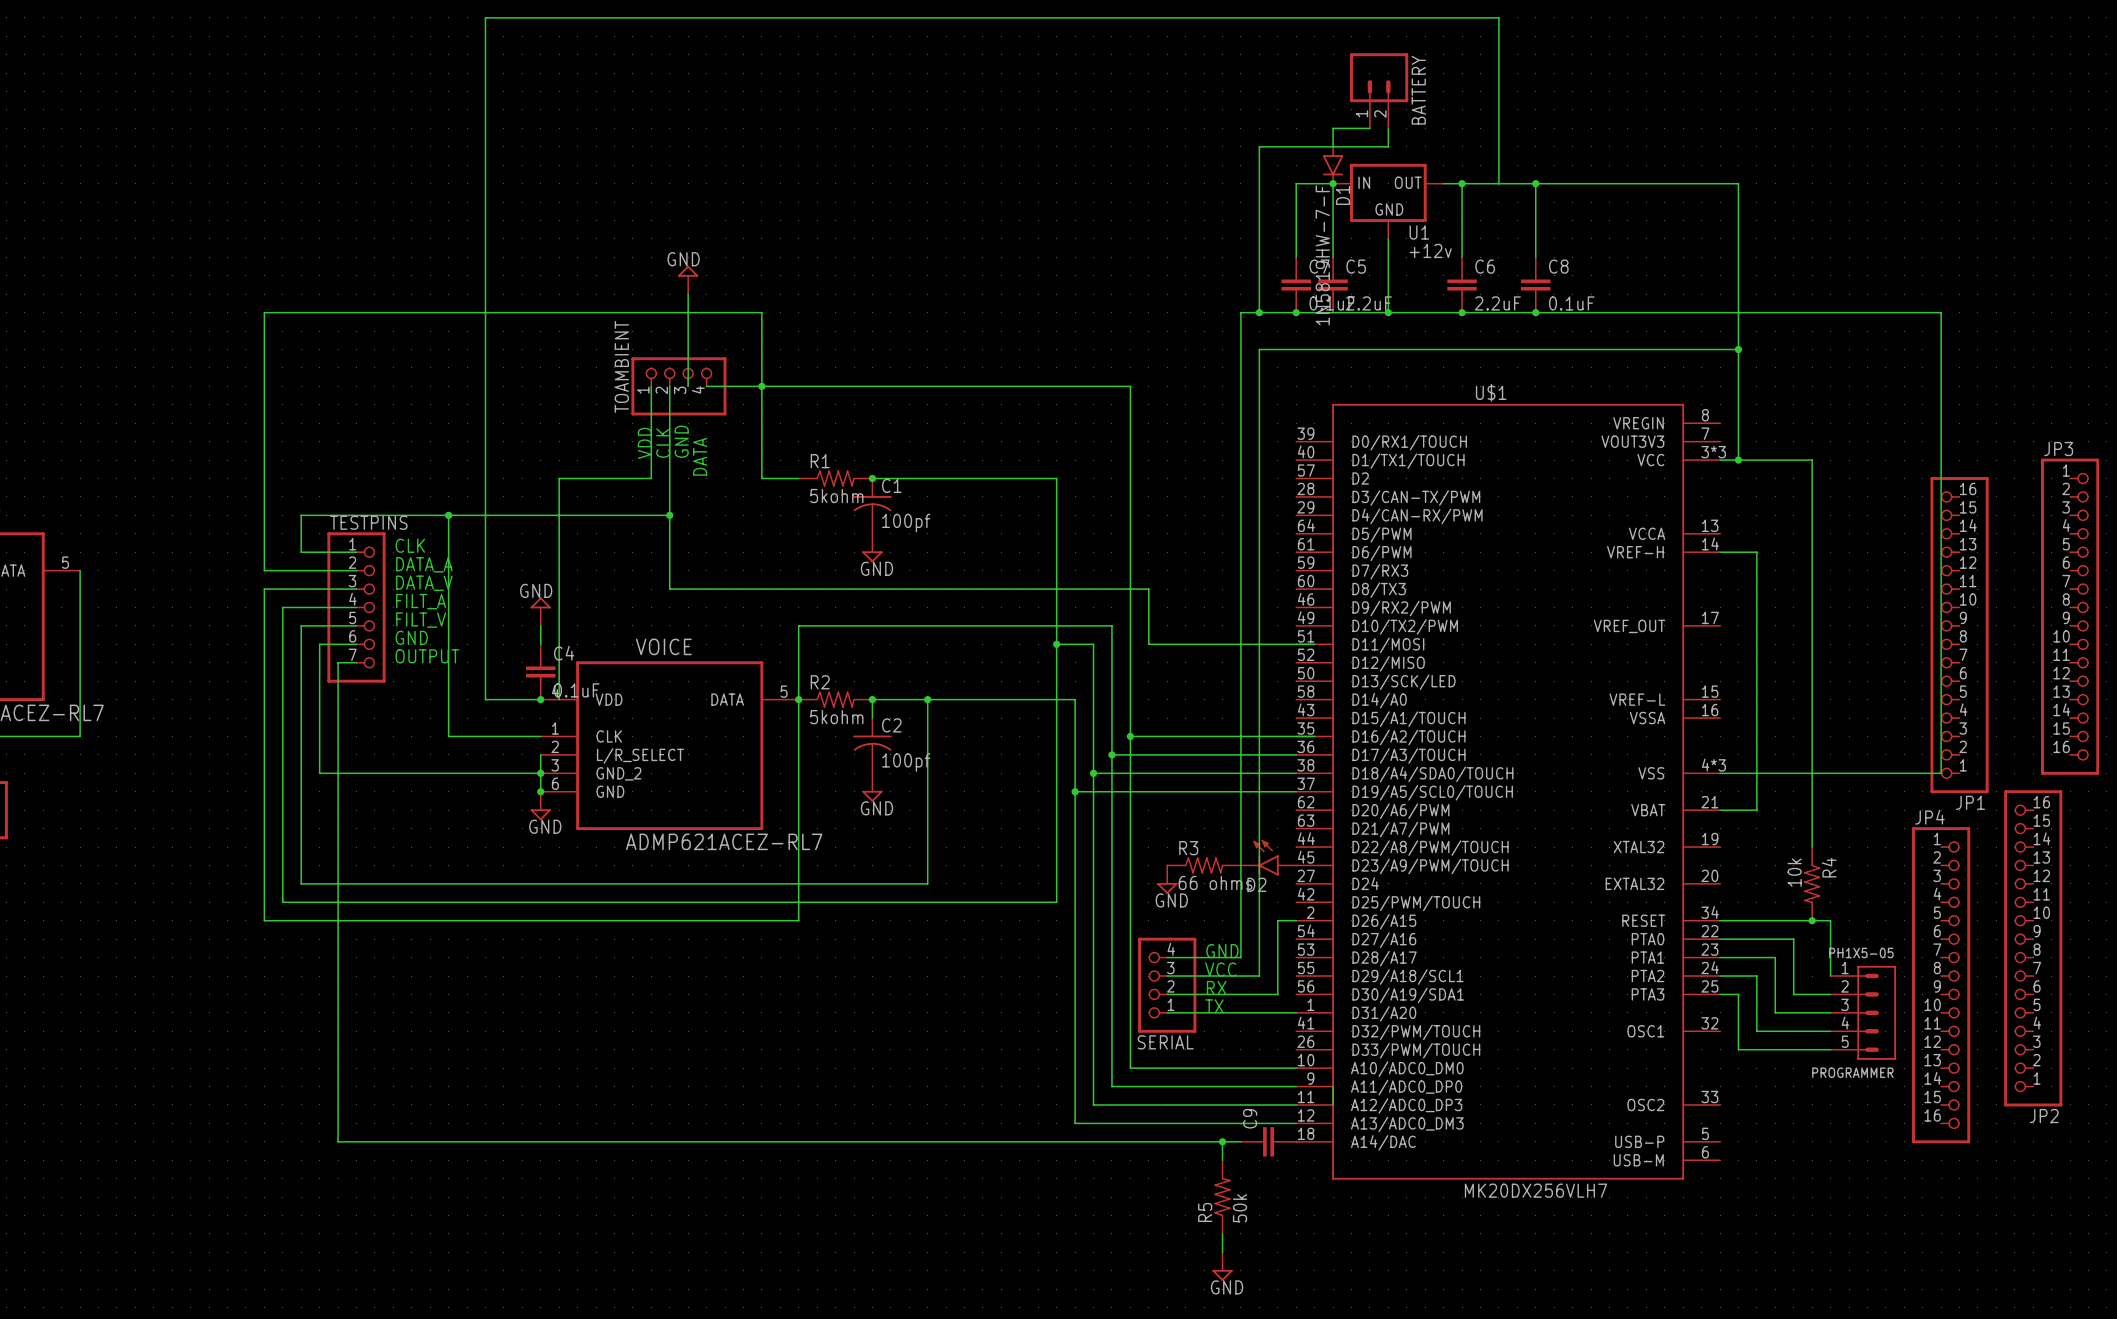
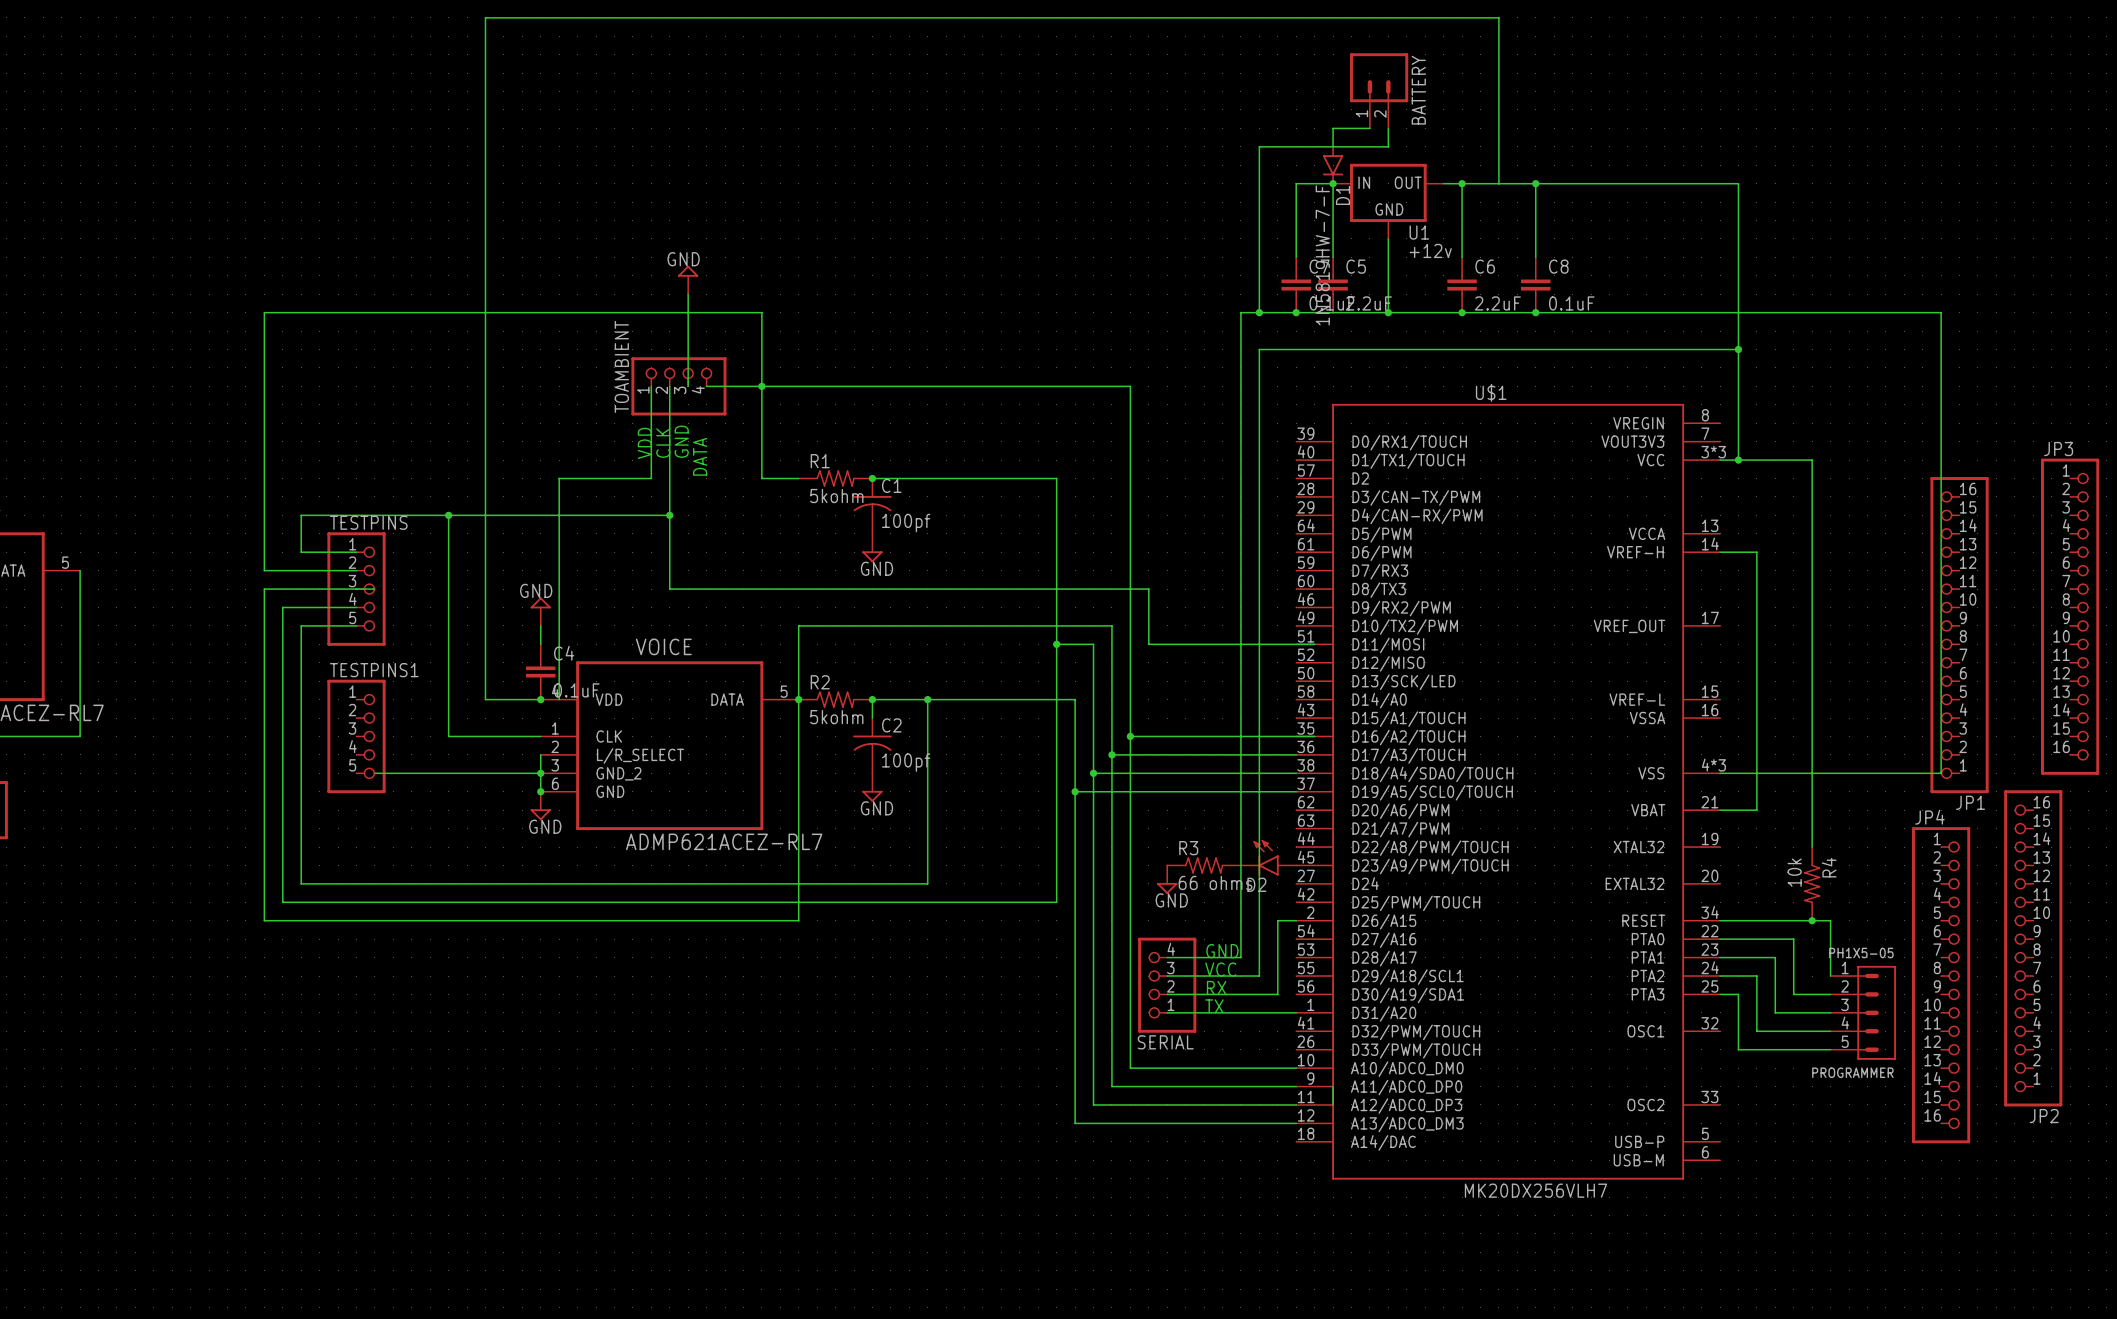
text: CLK (410, 545) -> none
text: DATA_A (424, 564) -> none
text: DATA_V (424, 583) -> none
TESTPINS: none -> (356, 589)
text: FILT_A (421, 601) -> none
TESTPINS: (356, 607) -> none
text: FILT_V (421, 620) -> none
text: GND (411, 637) -> none
wire: (356, 644) (319, 644) (319, 773) (374, 773) -> none
text: OUTPUT (427, 656) -> none
wire: (356, 662) (338, 662) (338, 1141) (1240, 1141) -> none
TESTPINS1: none -> (356, 736)
wire: (1222, 1141) (1222, 1160) -> none
junction: (1222, 1141) -> none
C9: (1268, 1141) -> none
R5: 50k (1222, 1197) -> none
wire: (1222, 1233) (1222, 1252) -> none
power symbol: GND (1222, 1266) -> none

